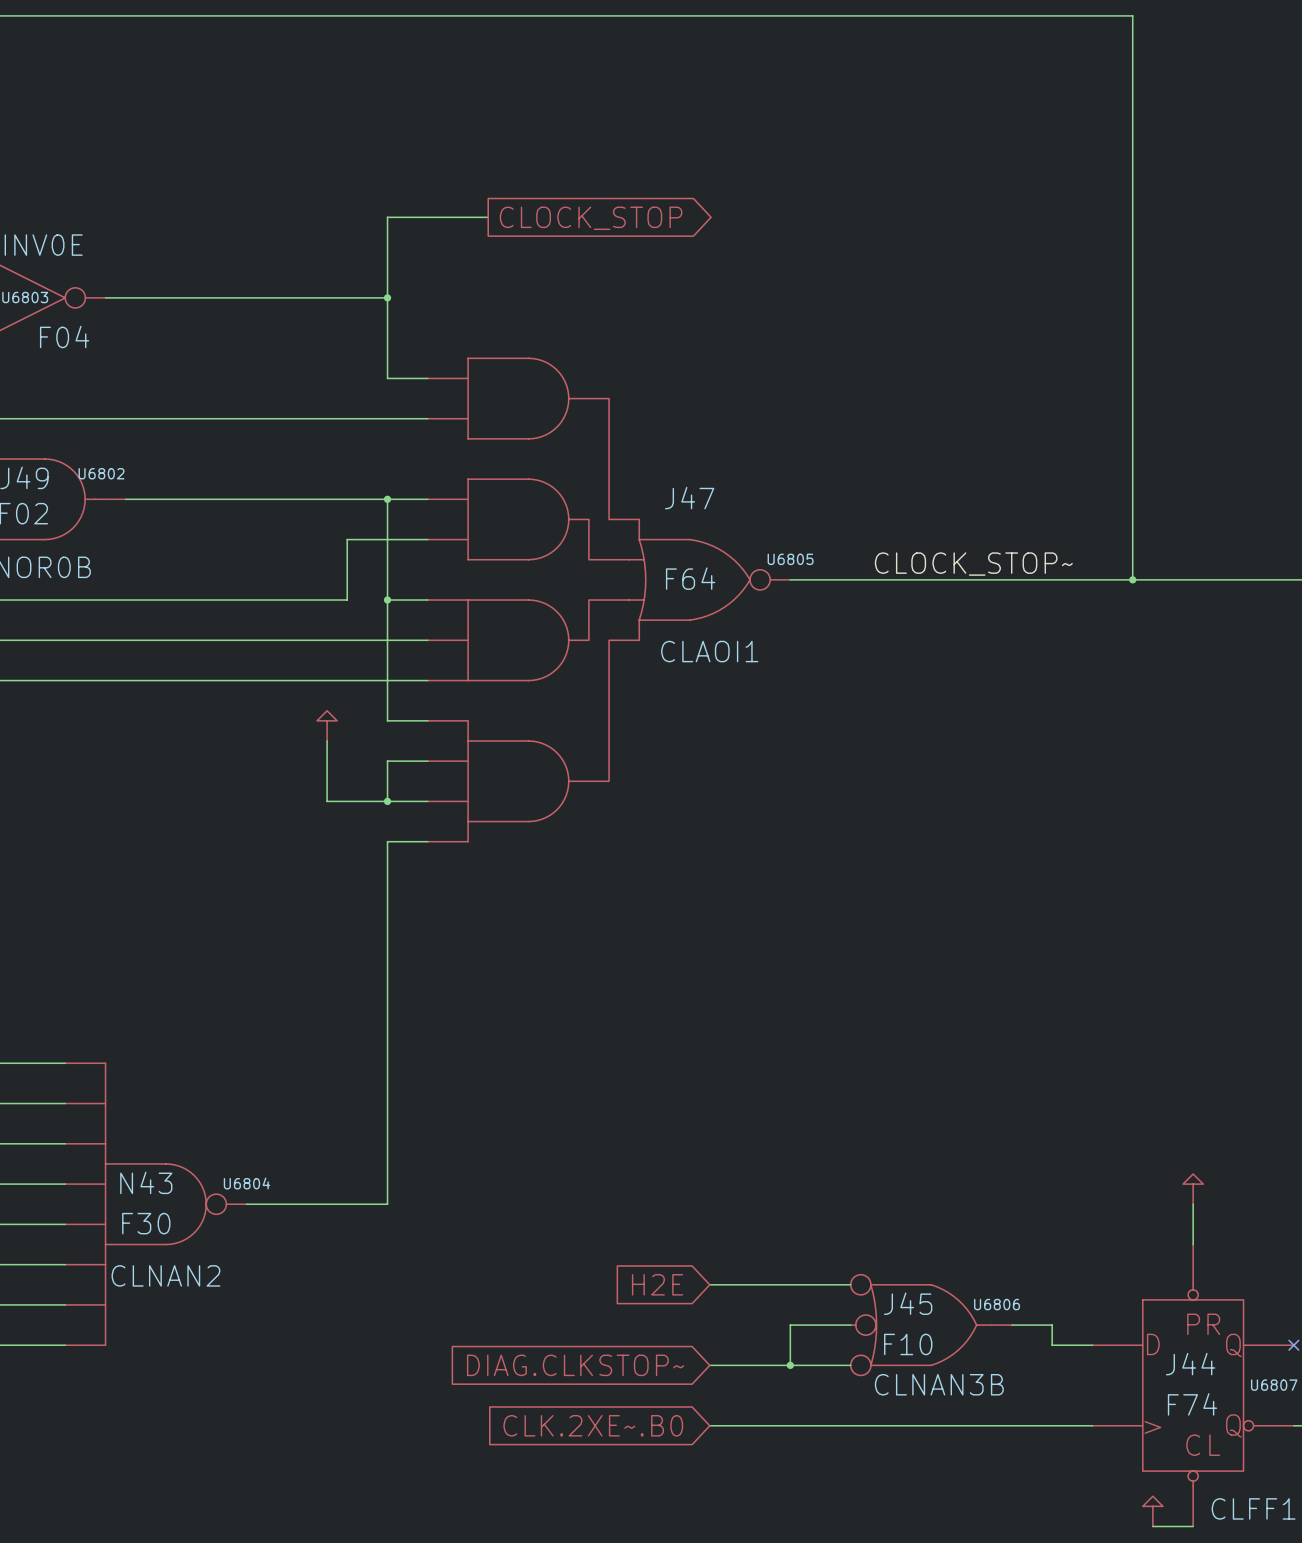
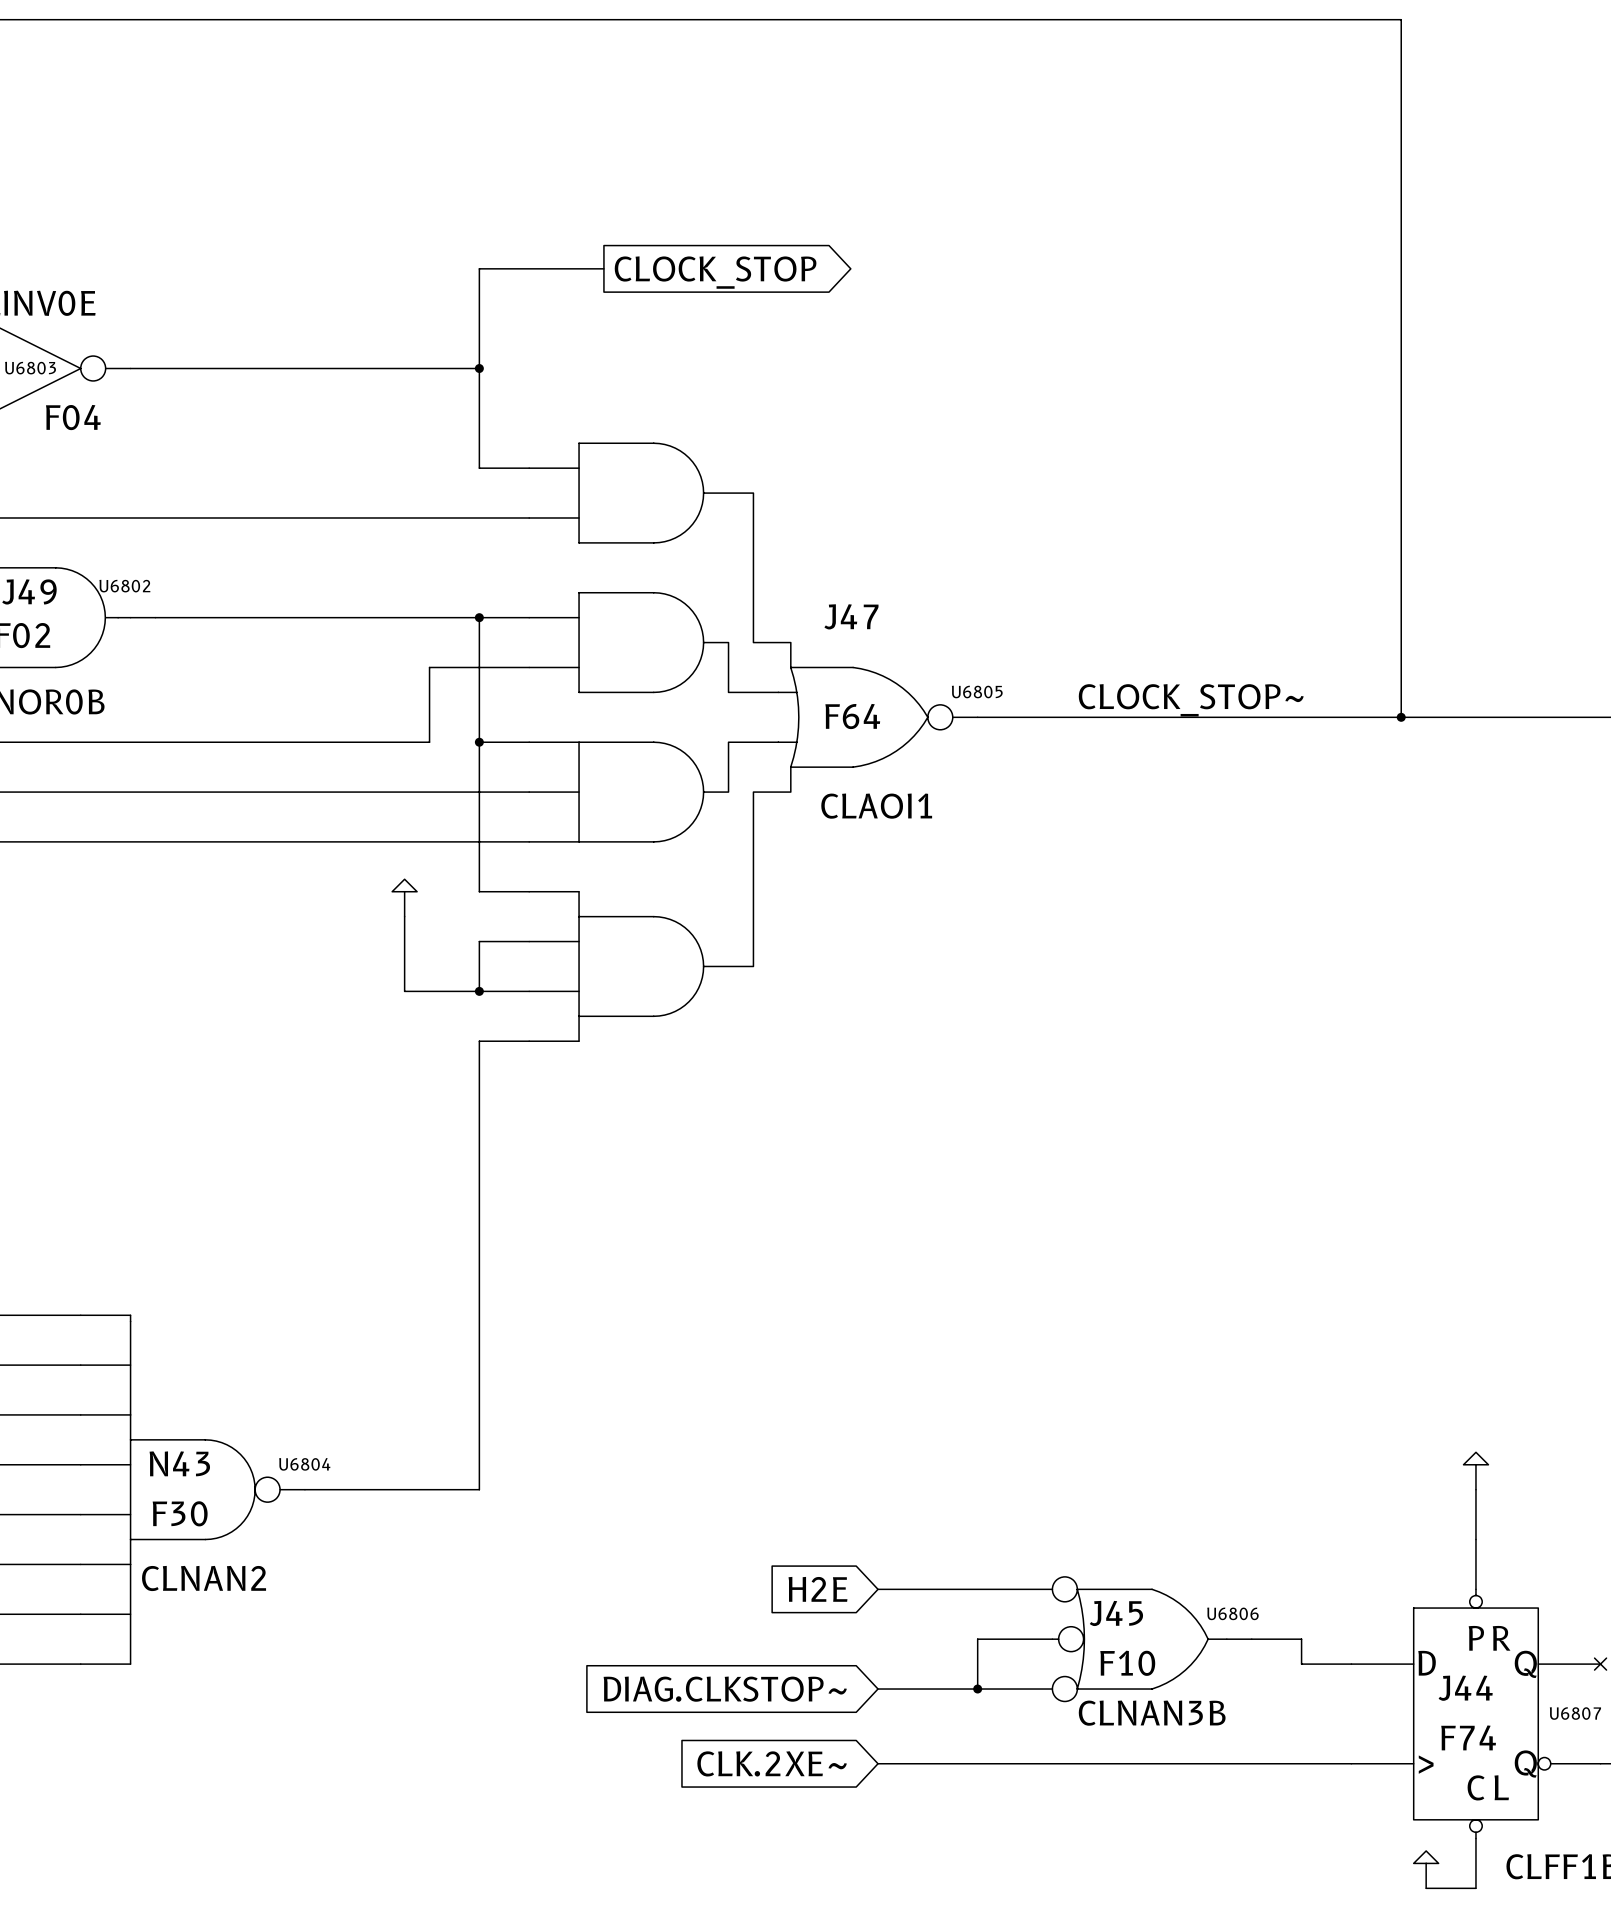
global label: CLK.2XE~.B0 (593, 1425) -> CLK.2XE~ (772, 1763)

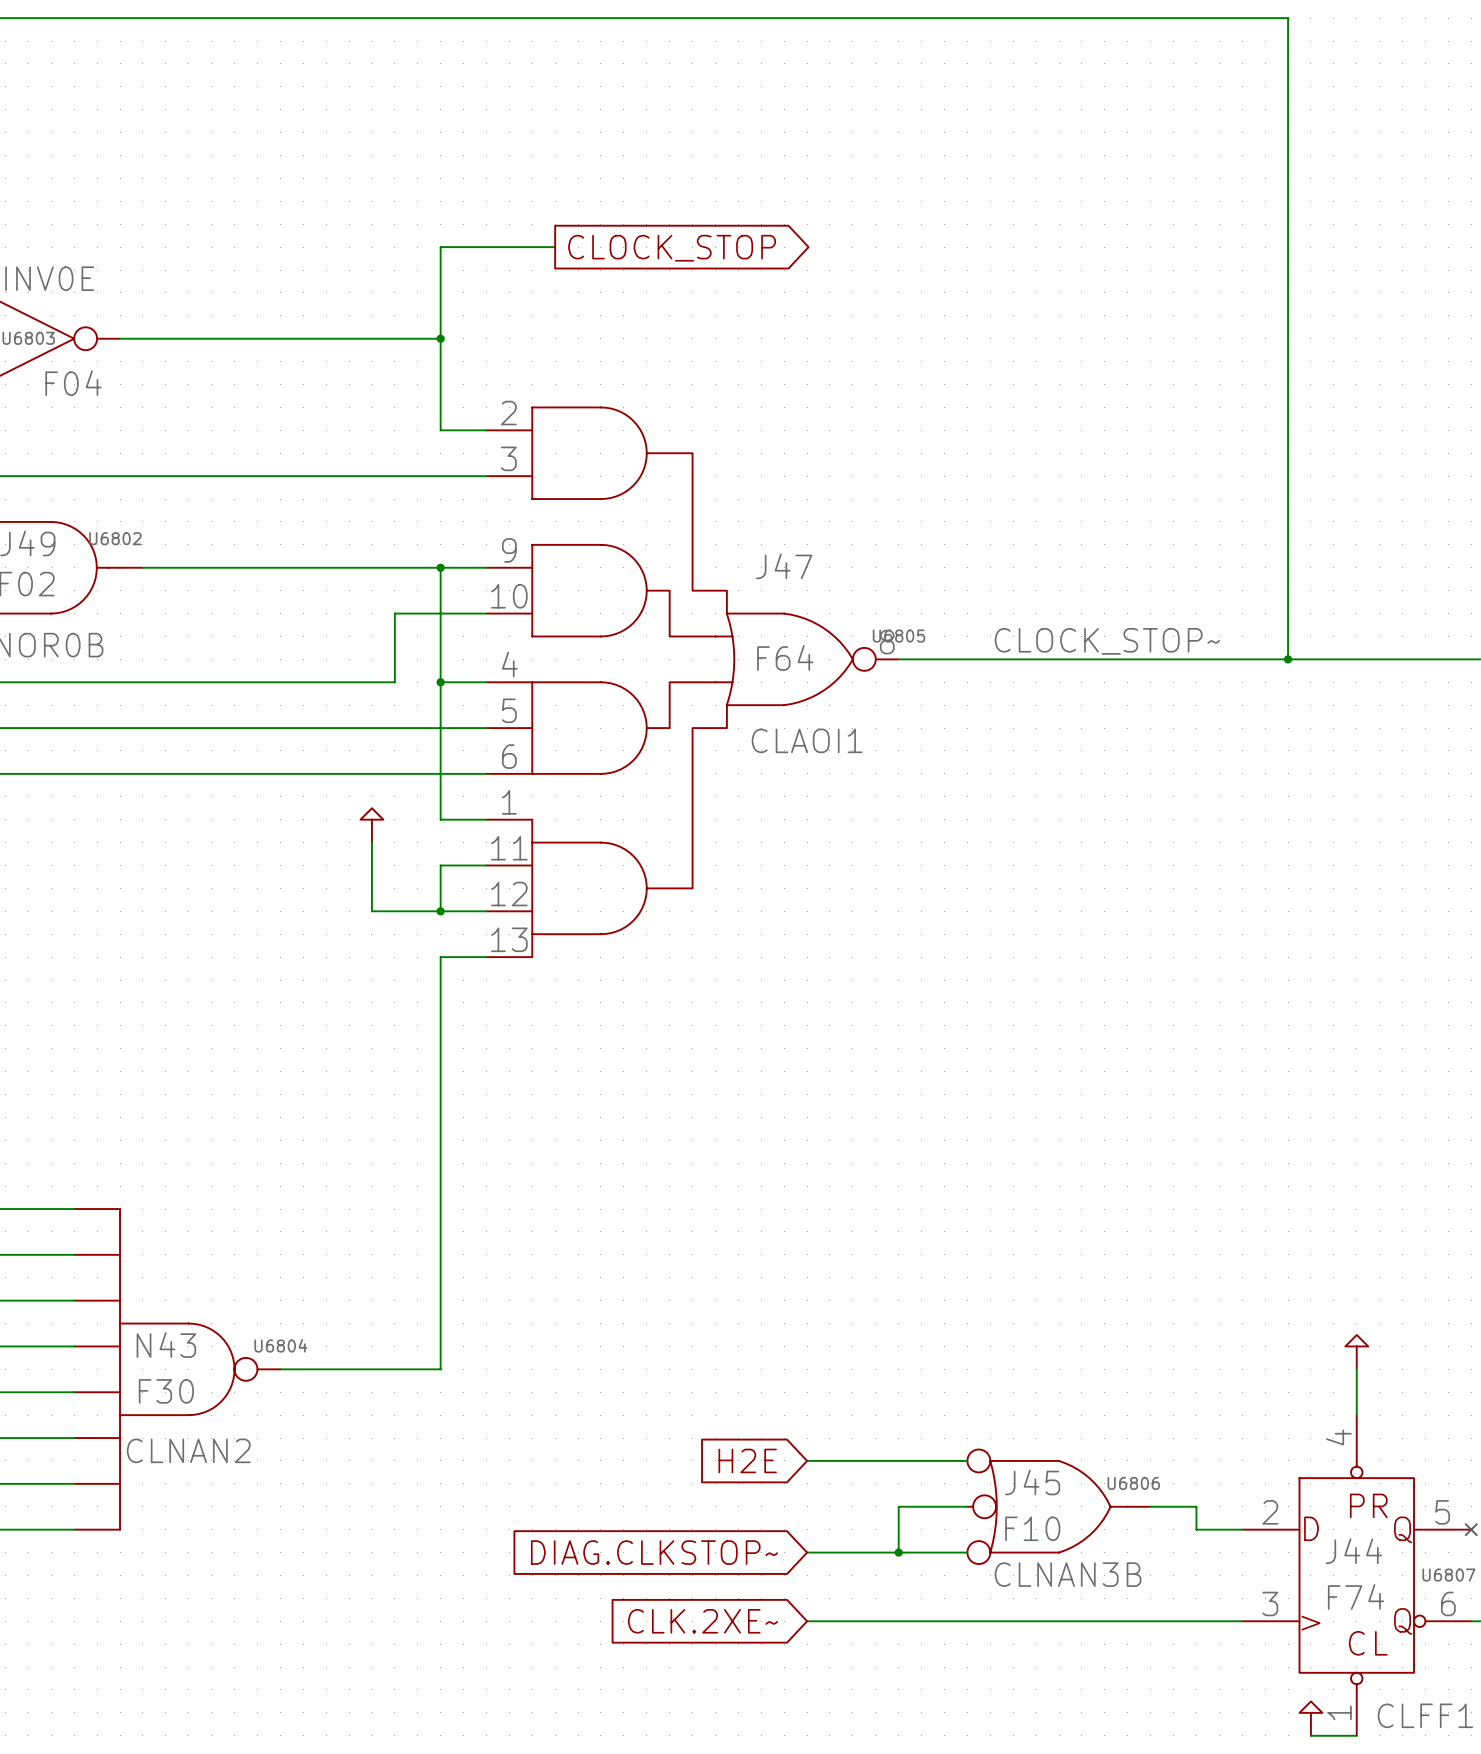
U6805 symbol: [529, 442, 978, 1042] -> [486, 406, 899, 958]
U6807 pin number: none -> 4 (1338, 1437)
U6807 pin number: none -> 2 (1270, 1512)
U6807 pin number: none -> 5 (1442, 1512)
U6807 pin number: none -> 3 (1270, 1603)
U6807 pin number: none -> 6 (1448, 1603)
U6807 pin number: none -> 1 (1339, 1712)

